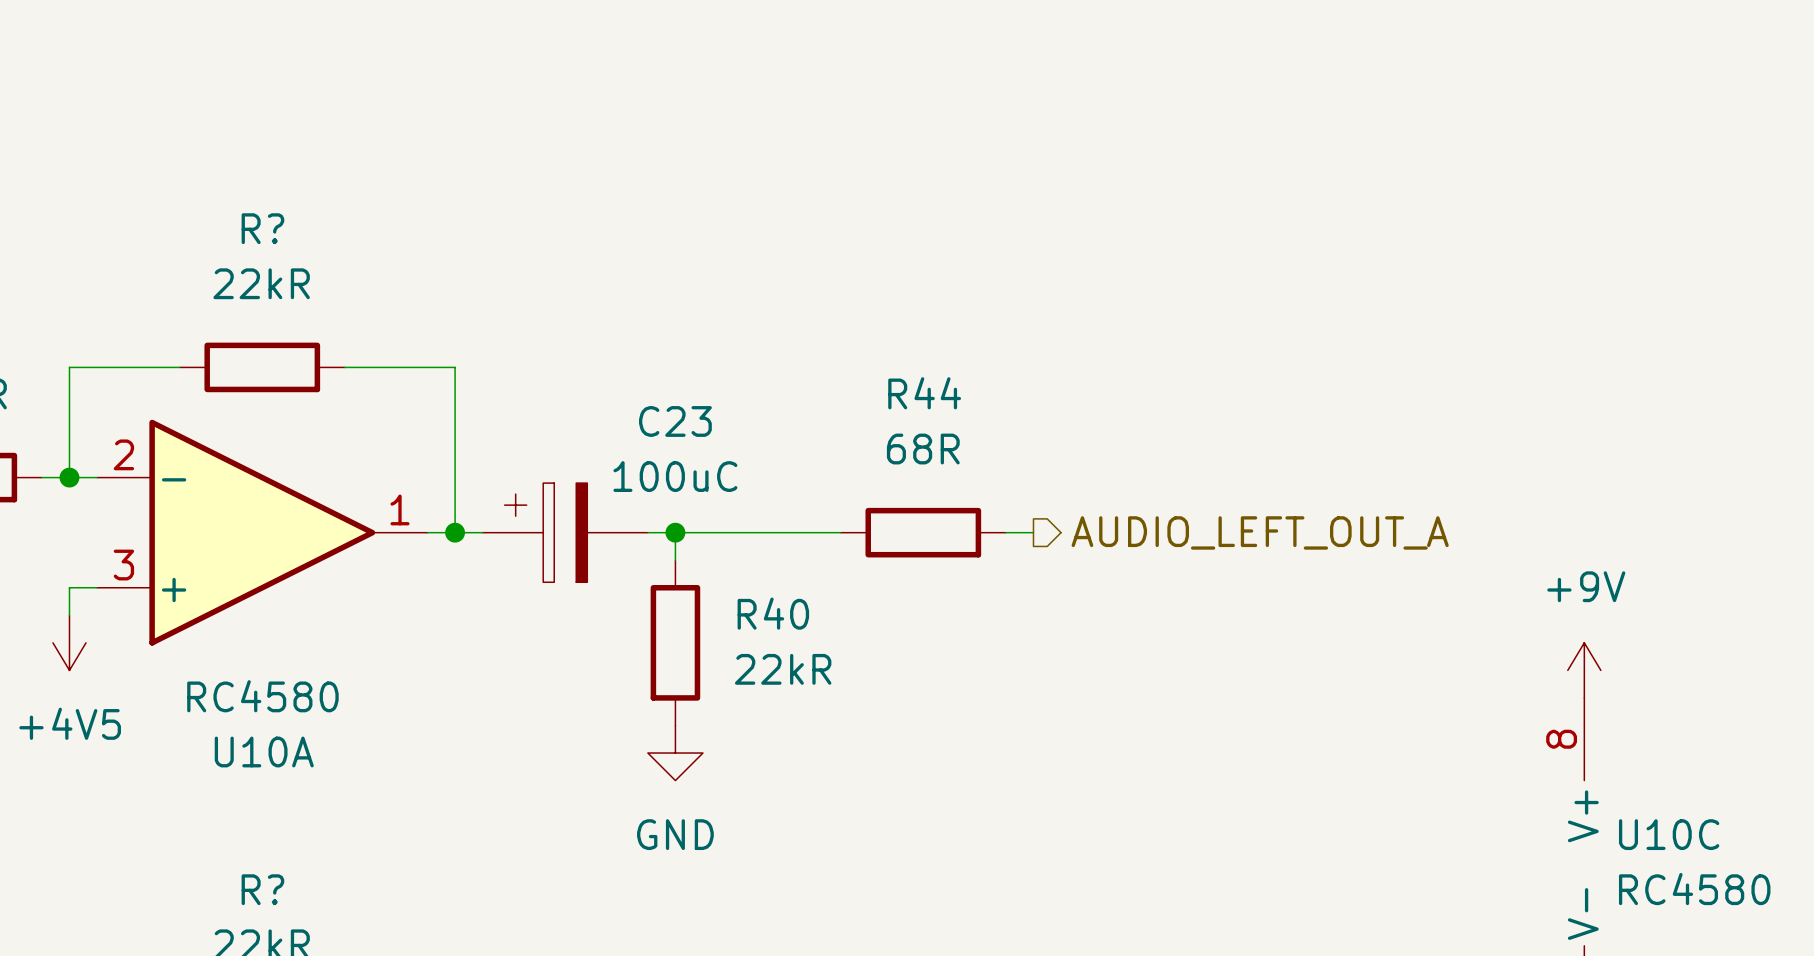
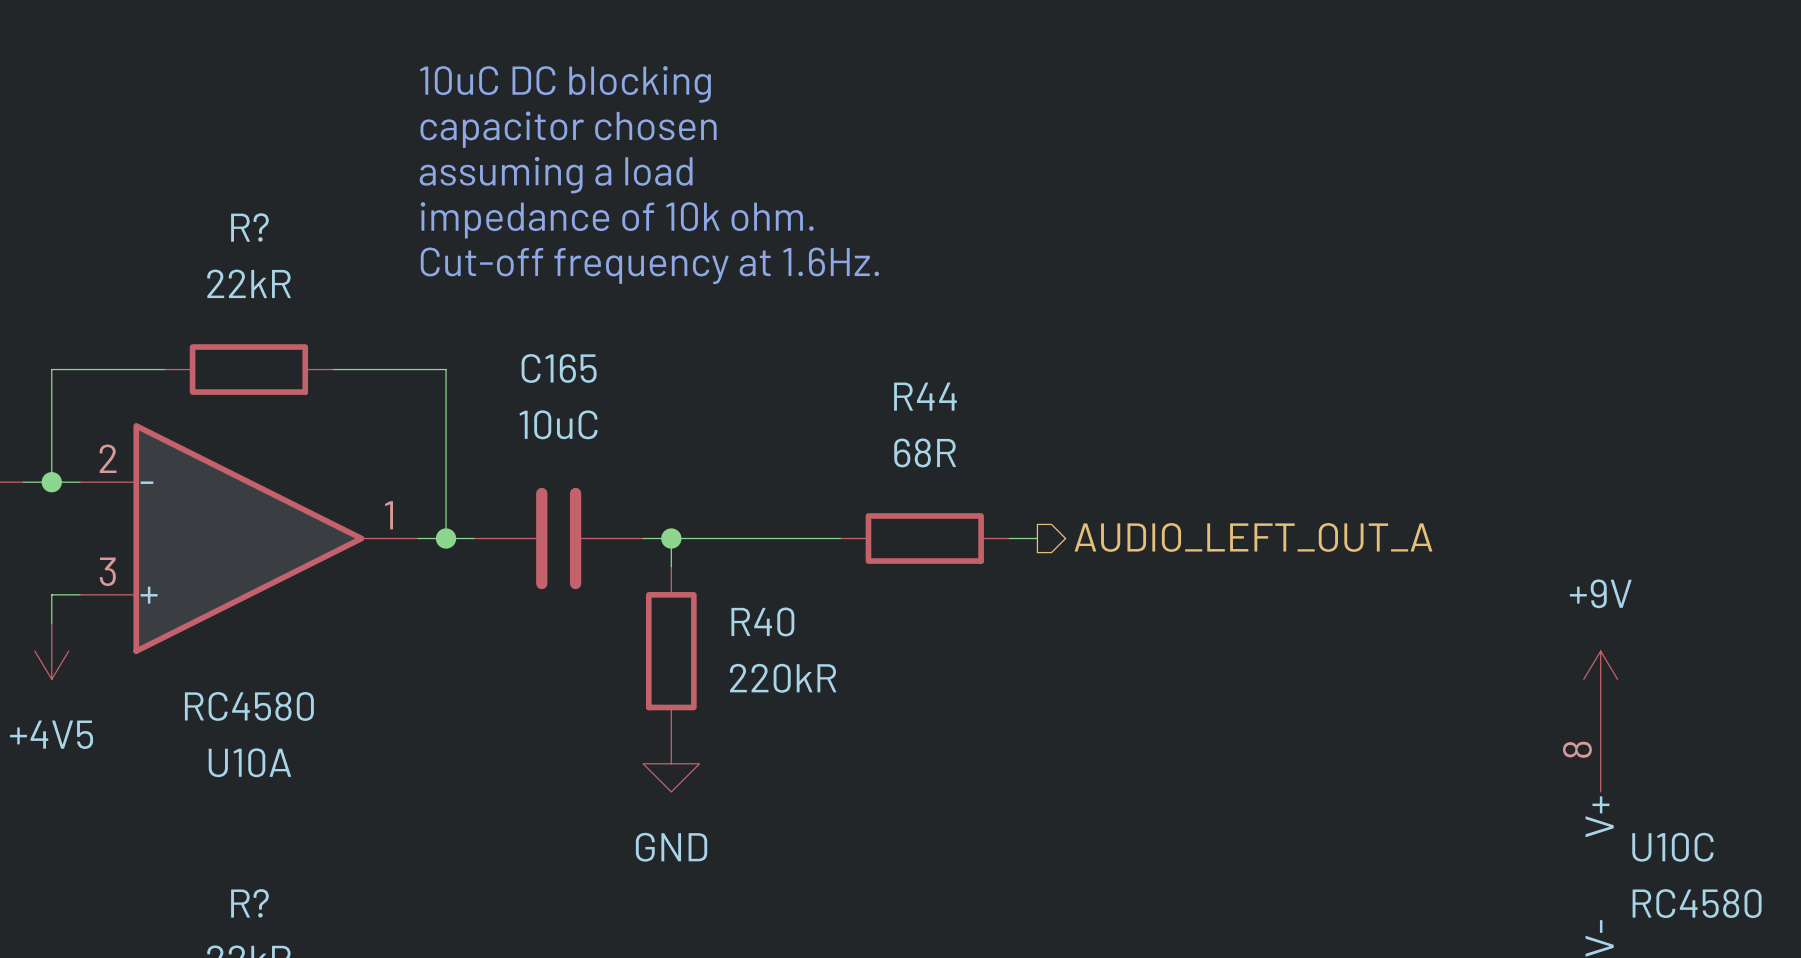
text: none -> 10uC DC blocking (565, 84)
text: none -> capacitor chosen (568, 129)
text: none -> assuming a load (556, 175)
text: none -> impedance of 10k ohm. (617, 220)
text: none -> Cut-off frequency at 1.6Hz. (649, 265)
C23: 100uC (565, 532) -> none
C165: none -> 10uC (558, 538)
R40 value: 22kR (783, 669) -> 220kR (783, 678)

